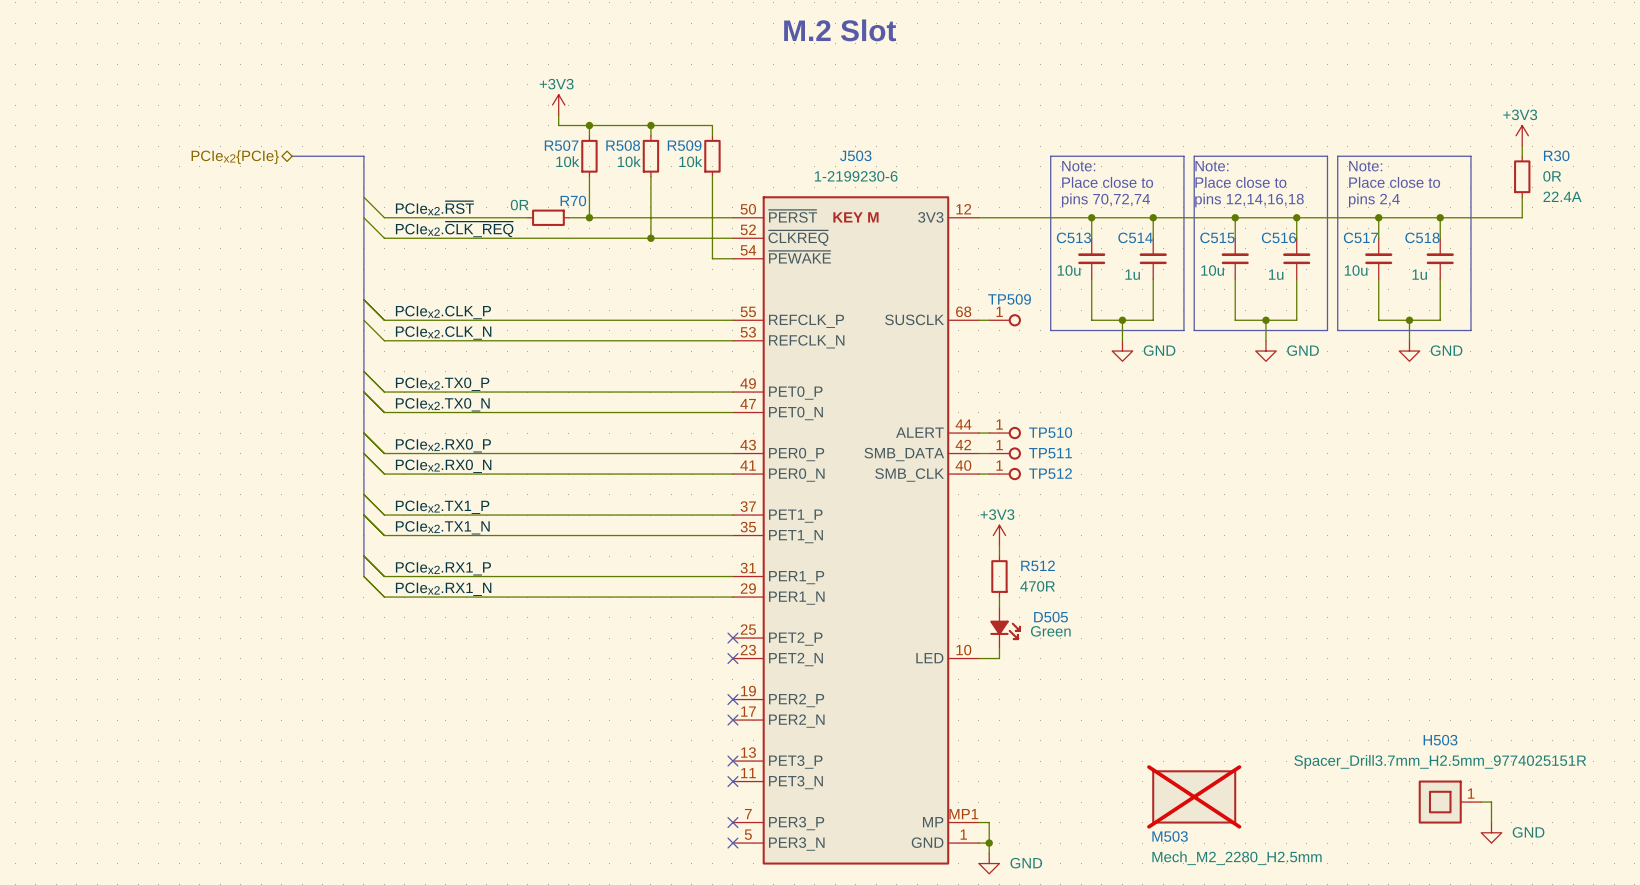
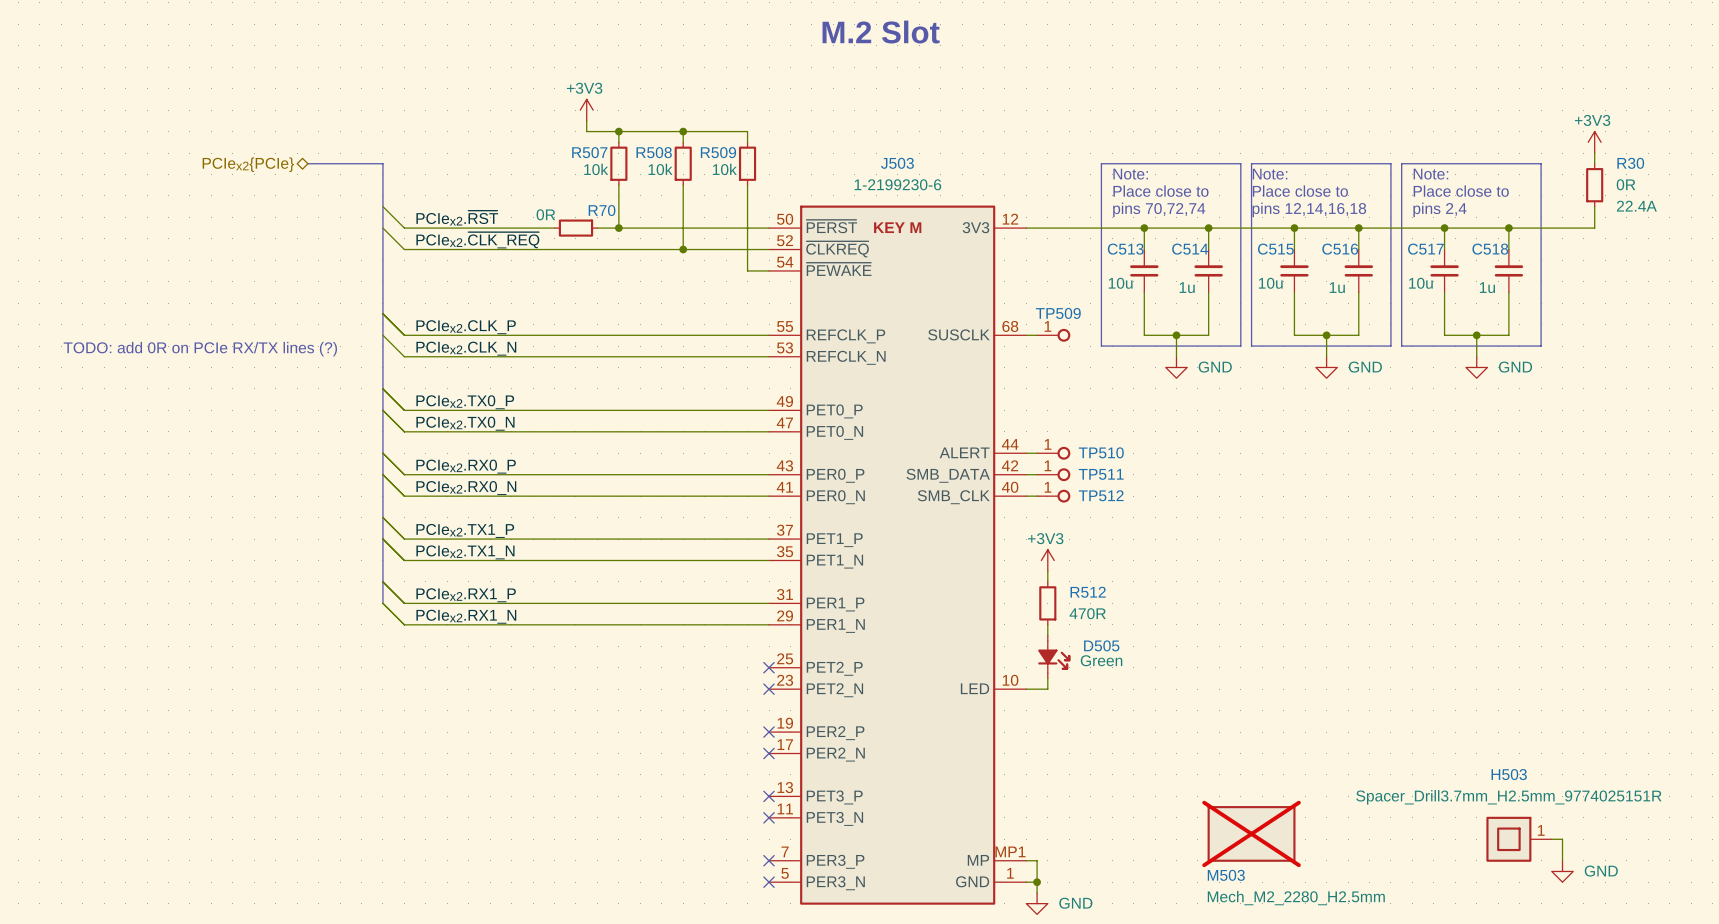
text: none -> TODO: add 0R on PCIe RX/TX lines (?) (200, 349)

